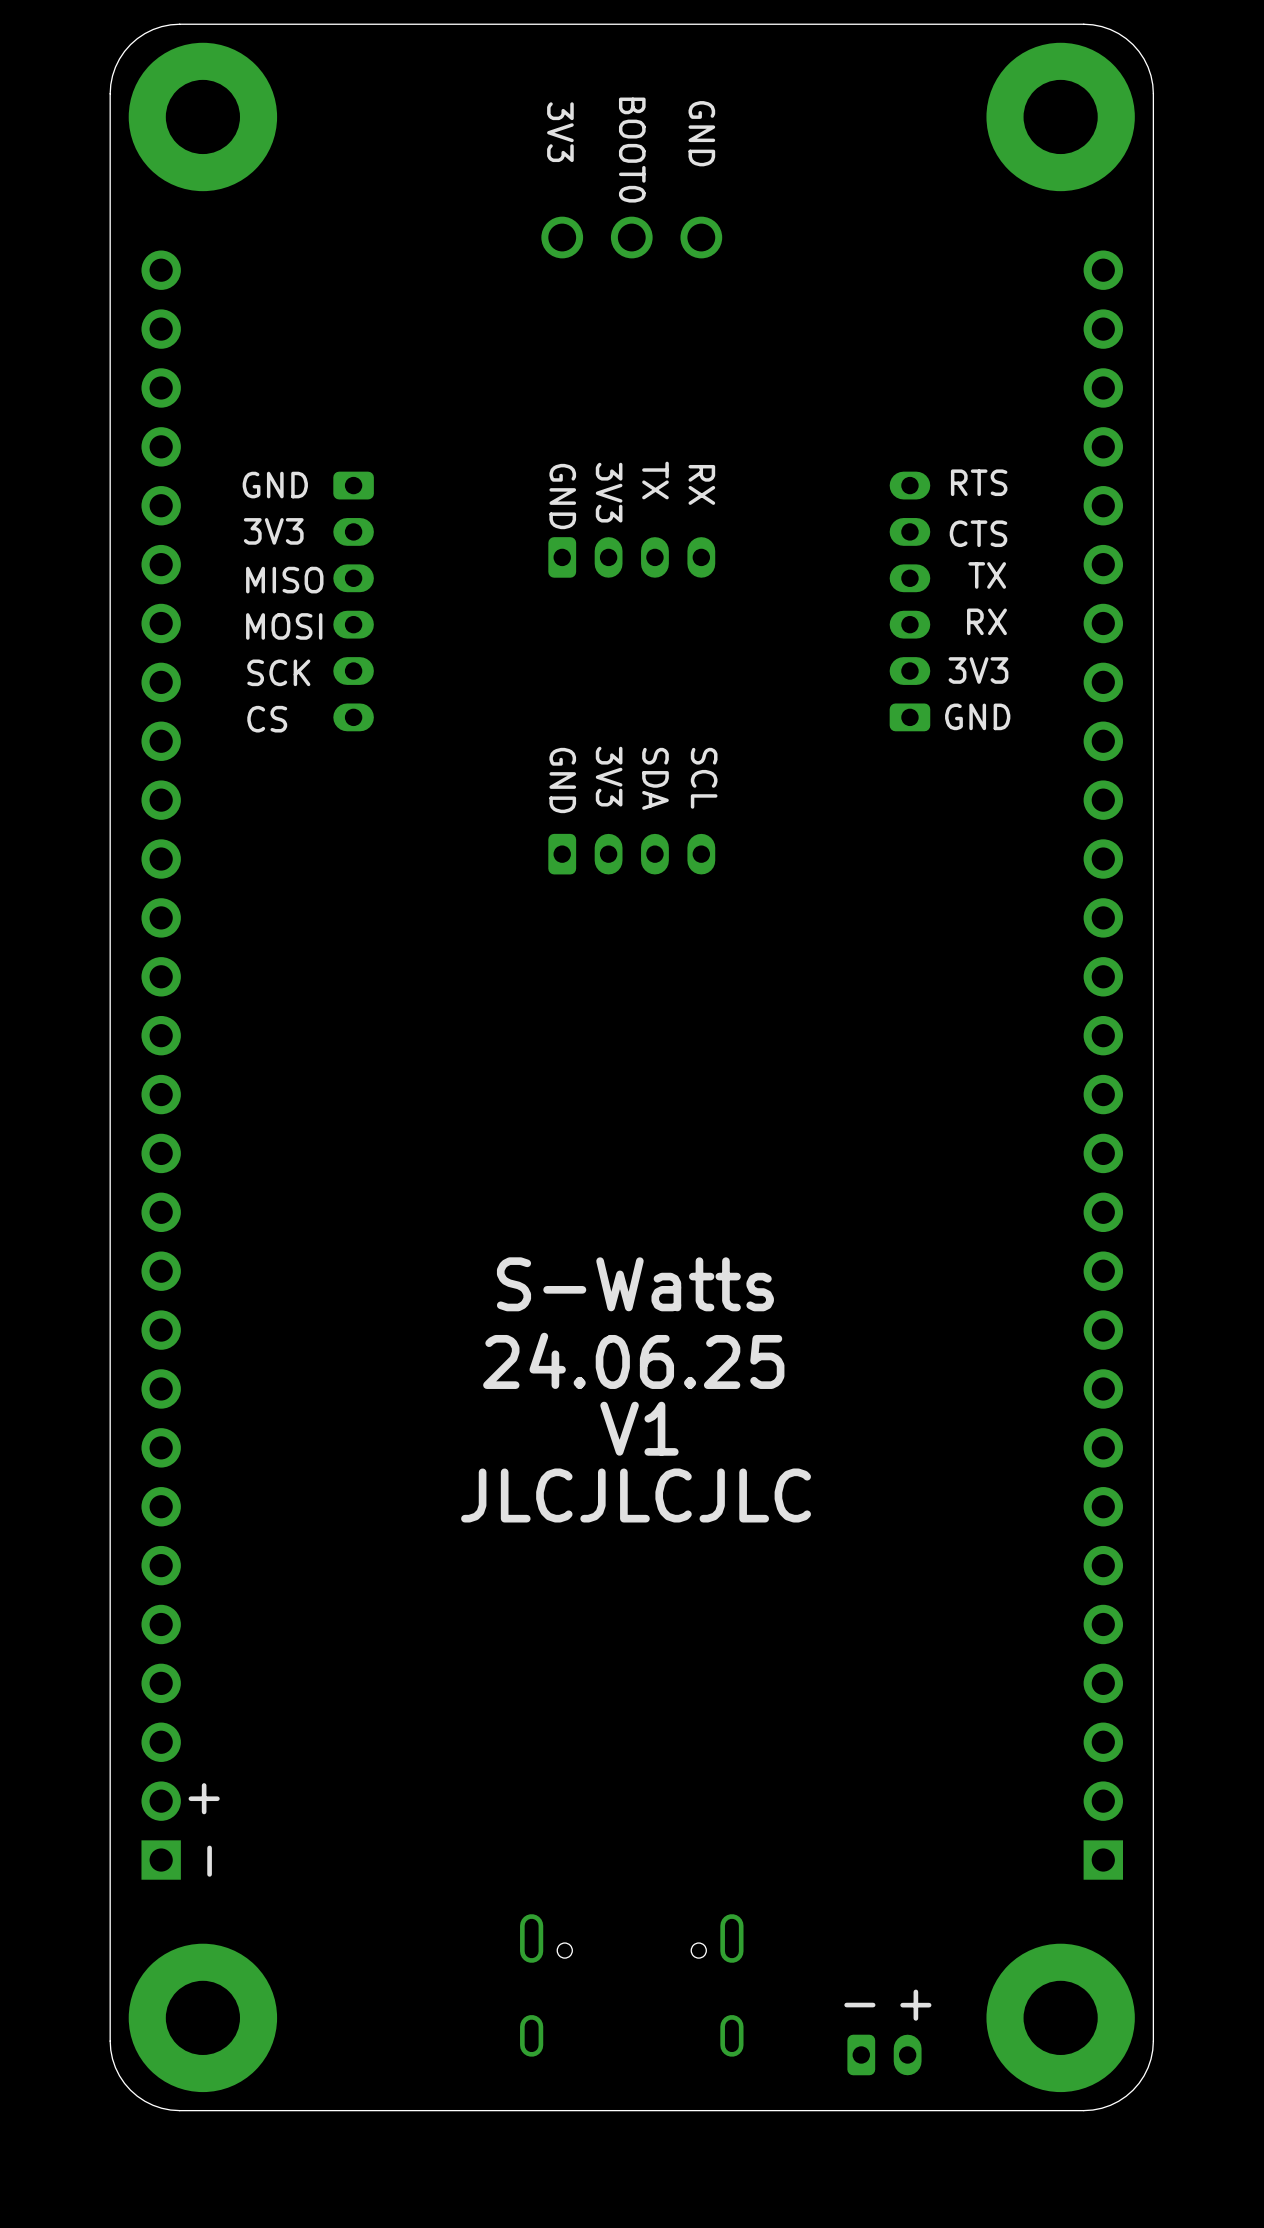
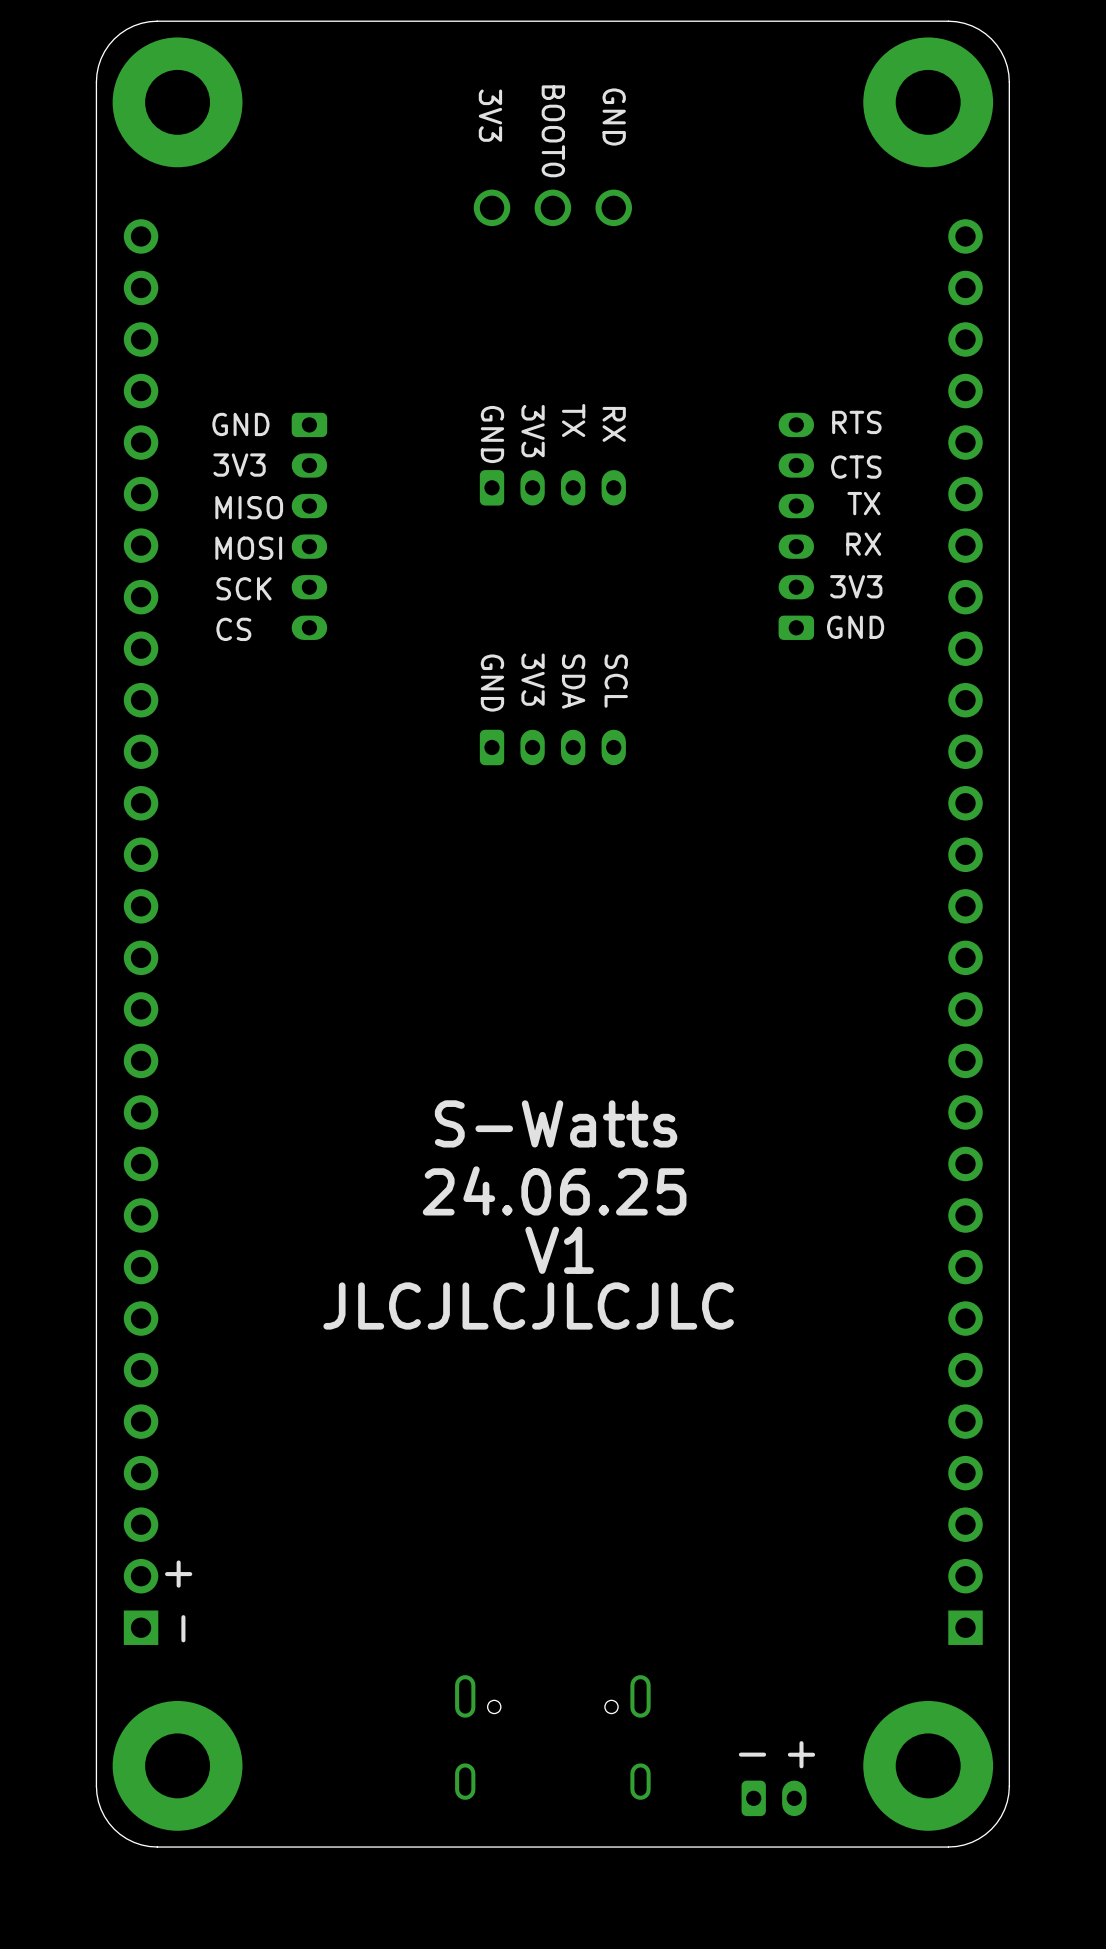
text: JLCJLCJLC (636, 1495) -> JLCJLCJLCJLC (528, 1305)

